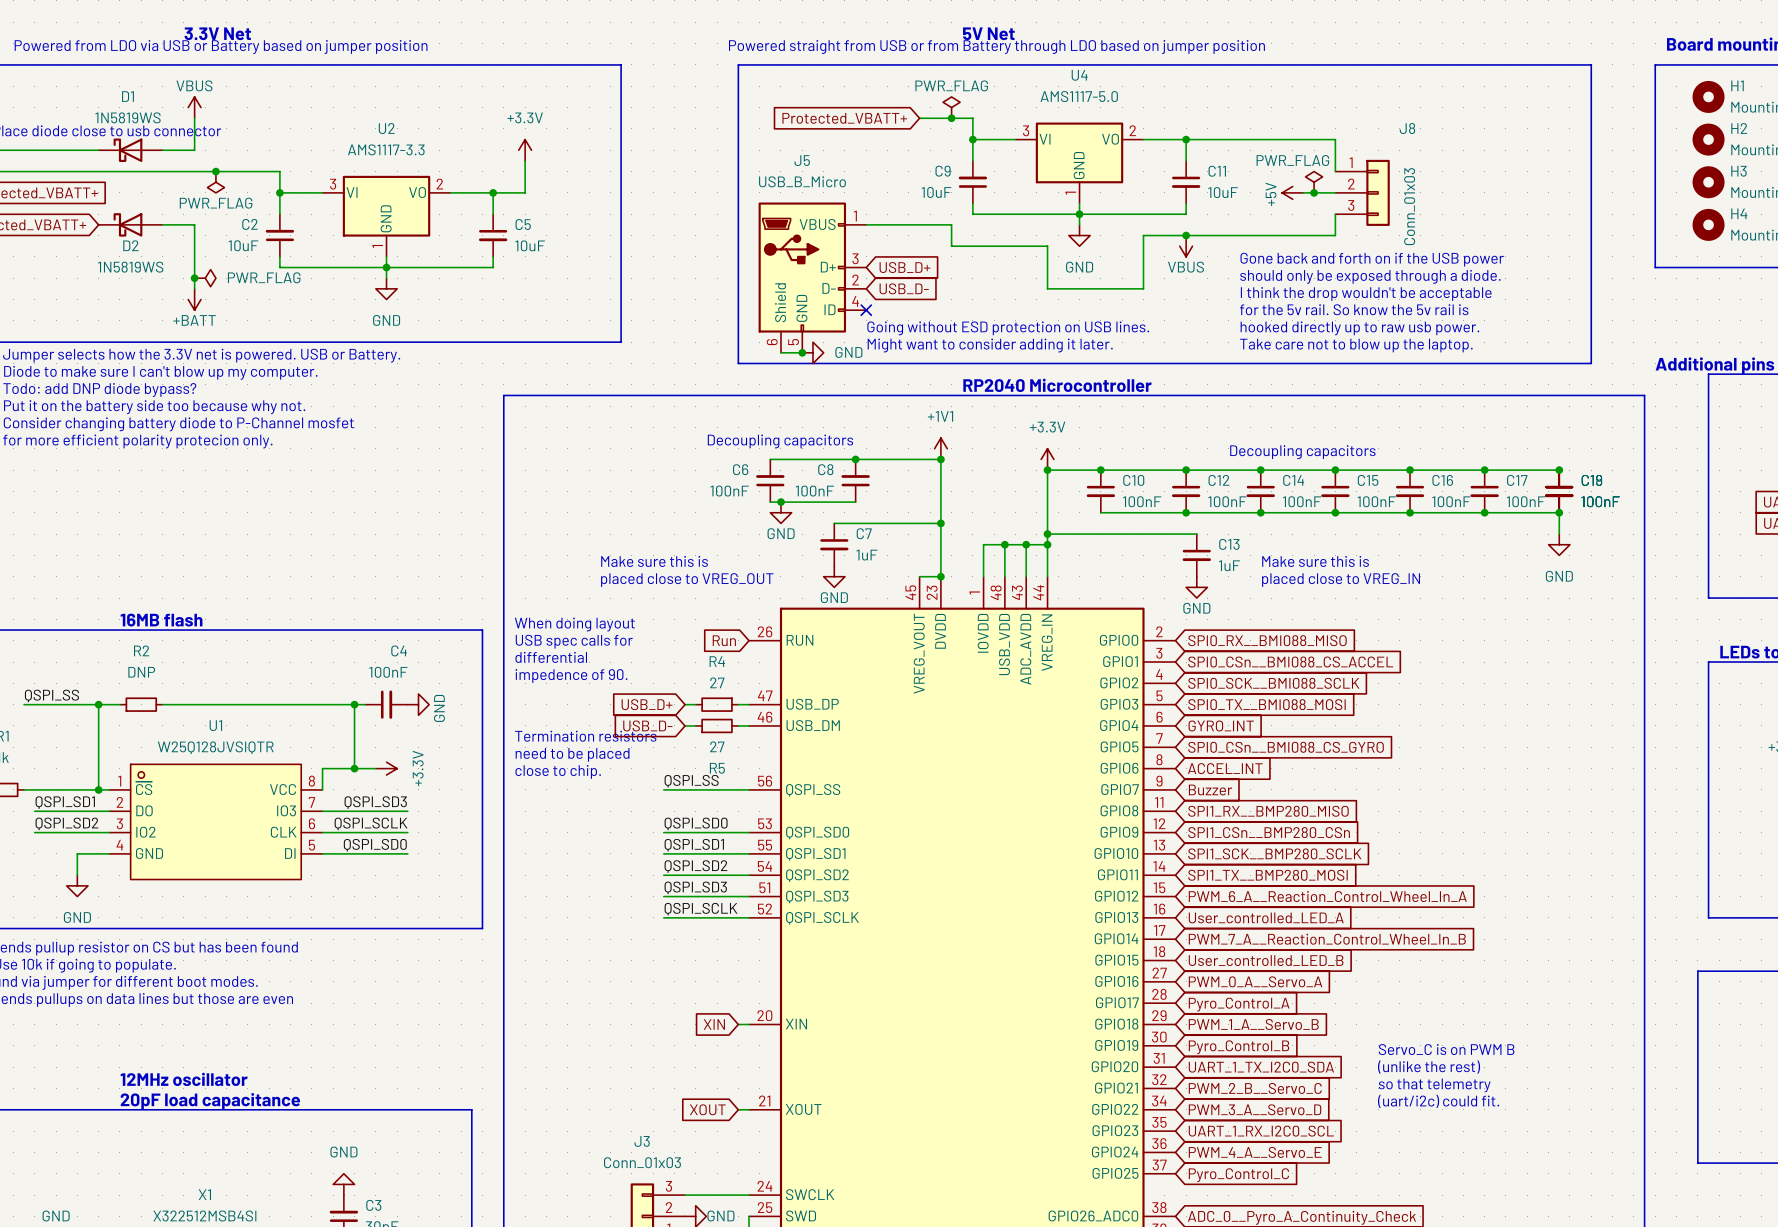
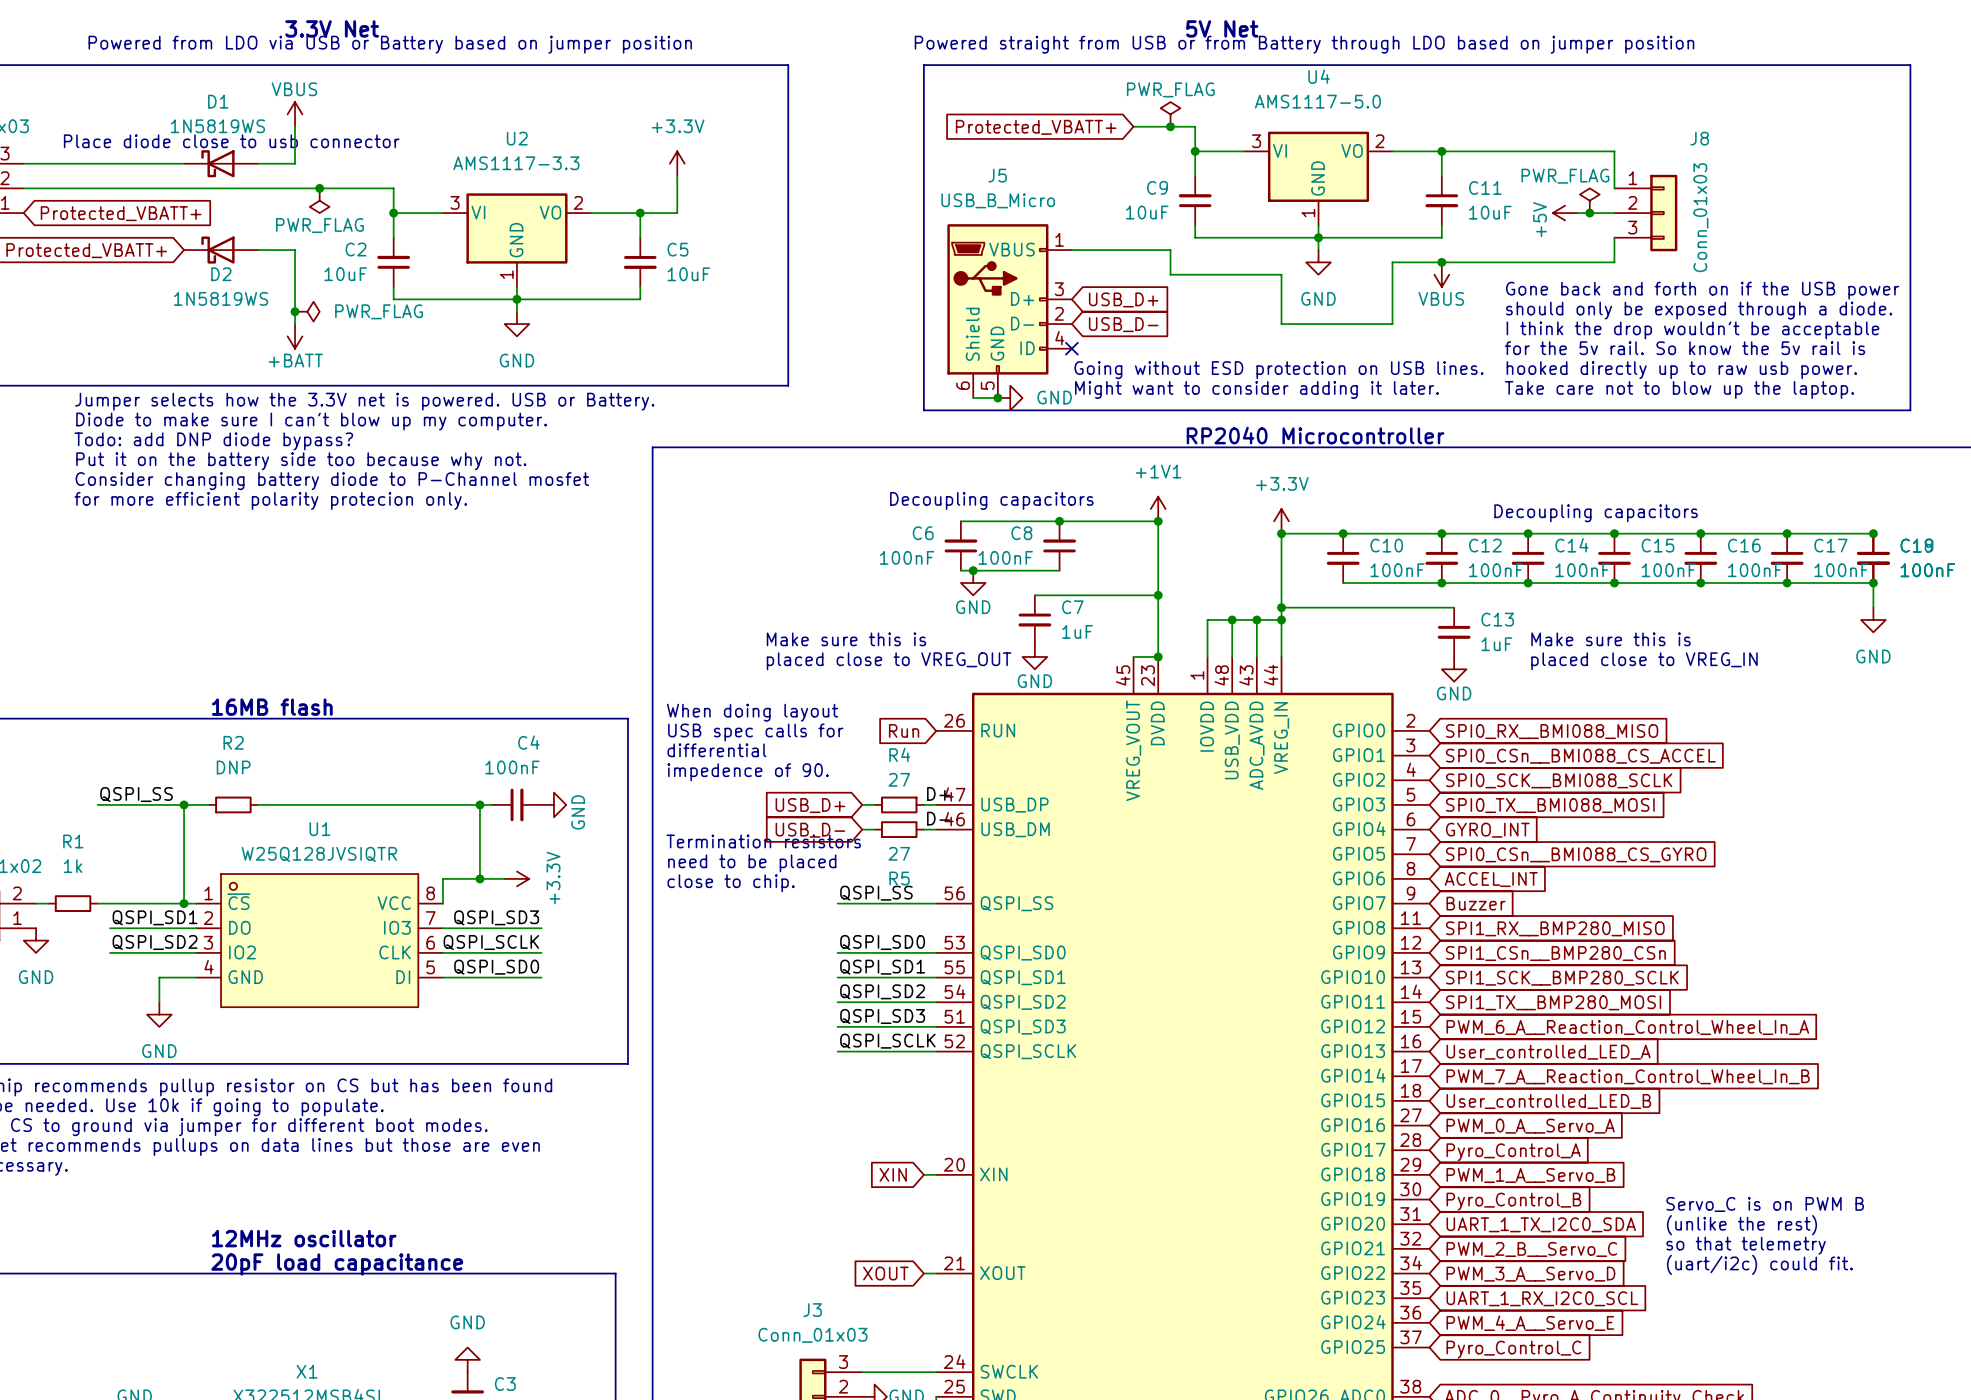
label: none -> D+ (938, 793)
label: none -> D- (938, 818)

